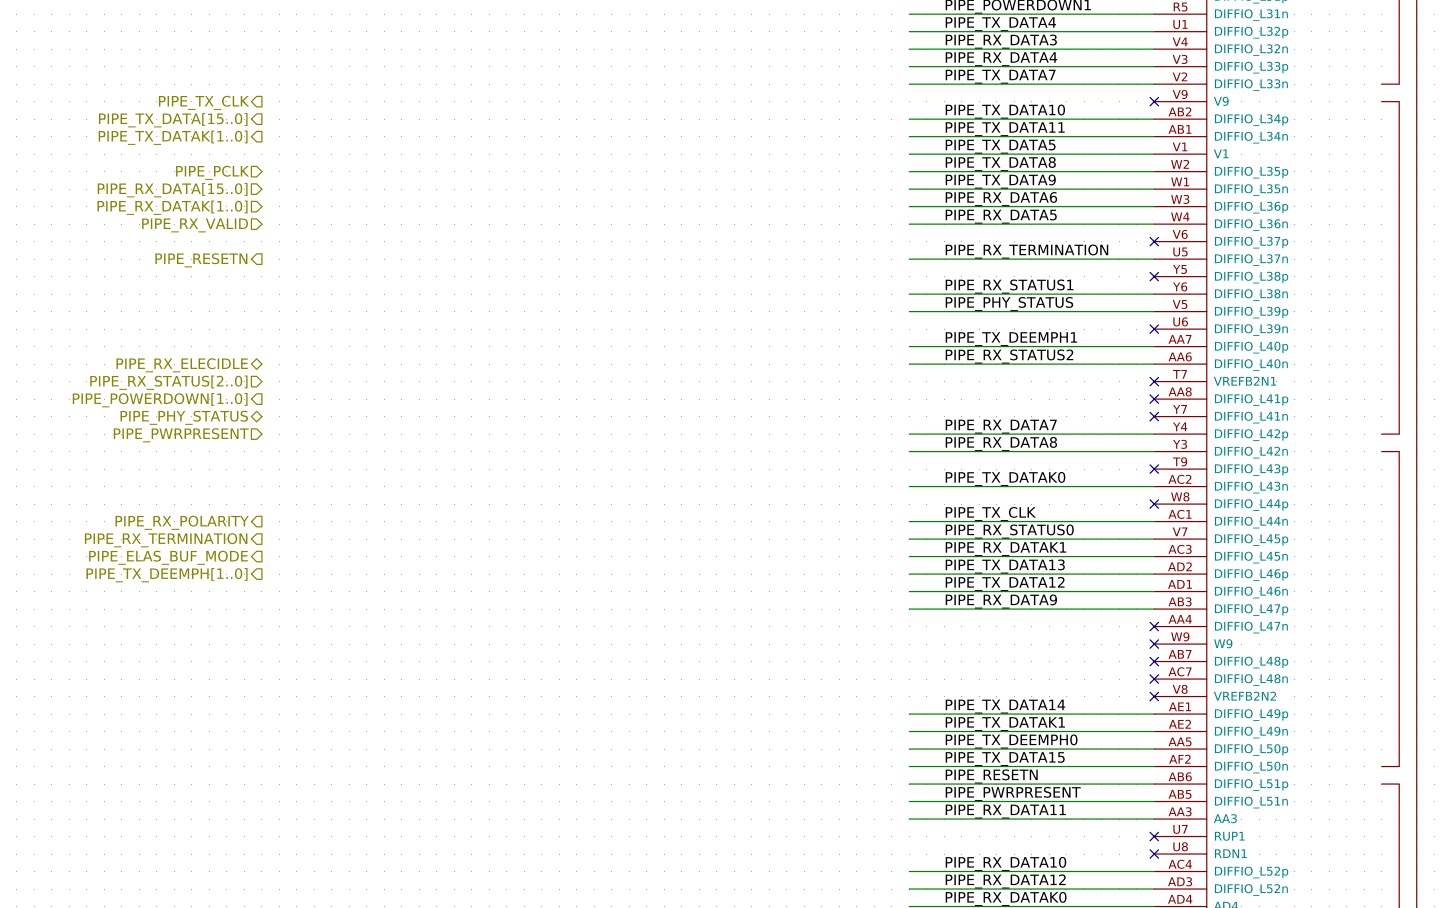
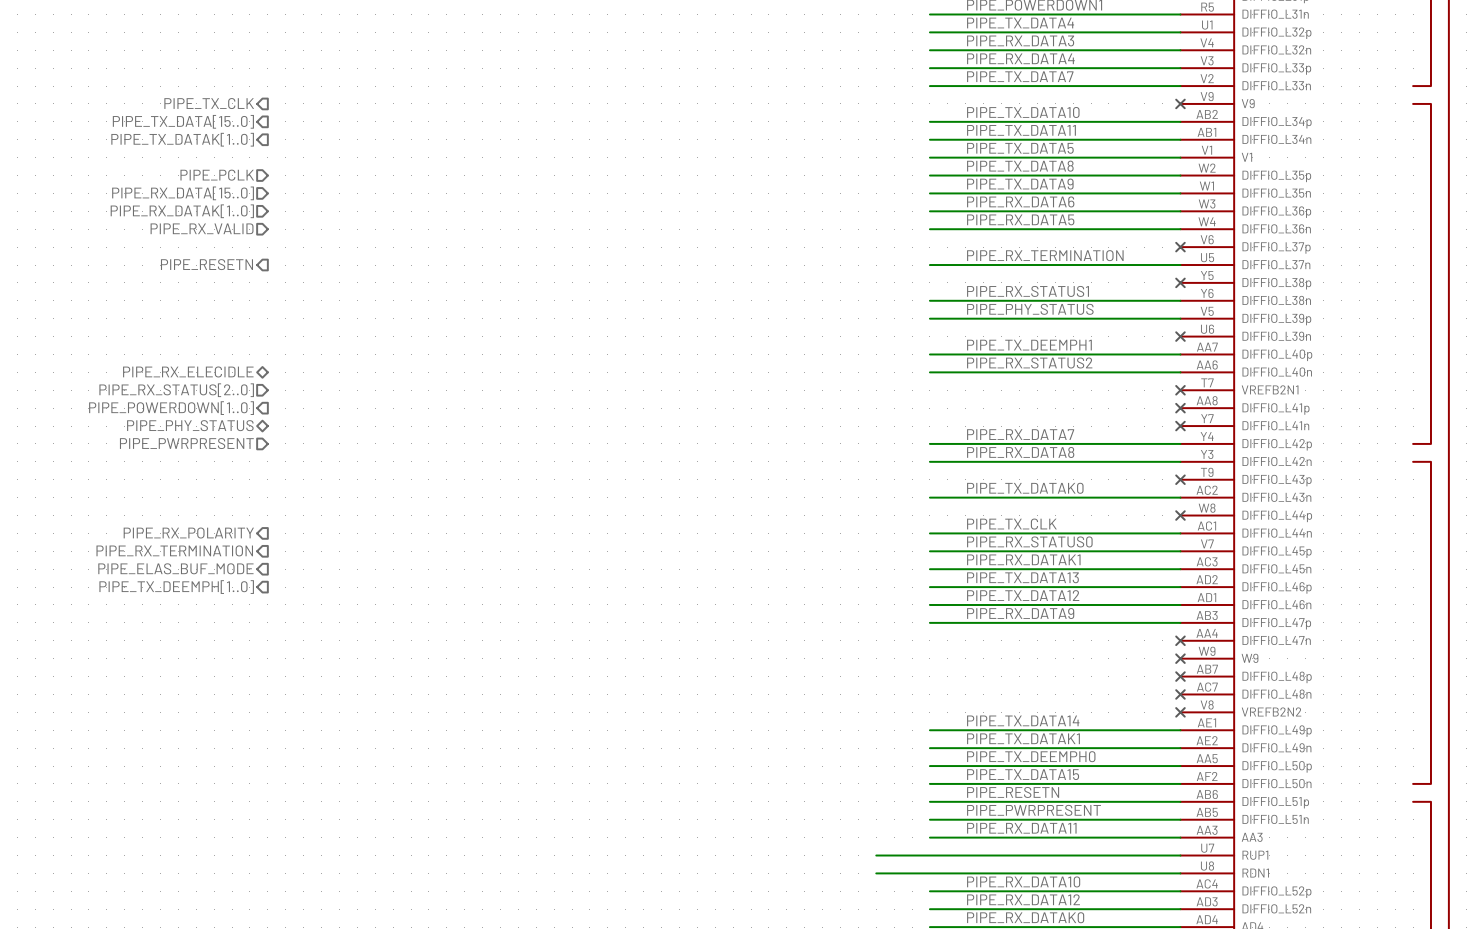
wire: none -> (876, 855) (1180, 855)
no-connect mark: (1154, 836) -> none
wire: none -> (876, 873) (1180, 873)
no-connect mark: (1154, 854) -> none

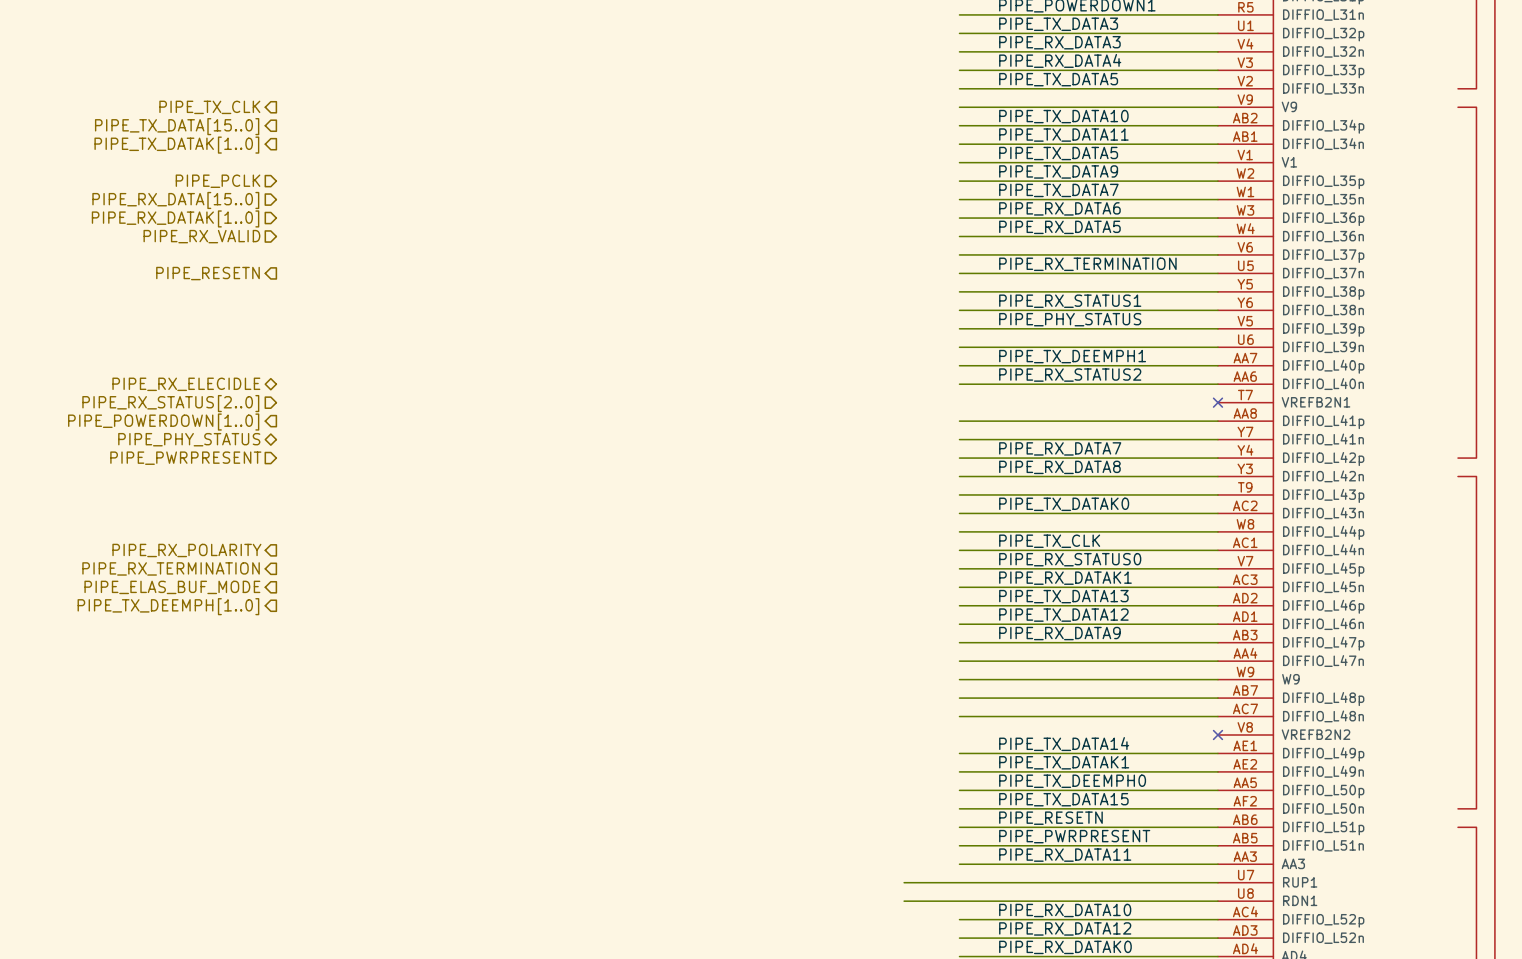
label: PIPE_TX_DATA4 (1020, 23) -> PIPE_TX_DATA3 (1058, 24)
label: PIPE_TX_DATA7 (1020, 76) -> PIPE_TX_DATA5 (1058, 79)
wire: none -> (959, 107) (1217, 107)
no-connect mark: (1180, 103) -> none
label: PIPE_TX_DATA8 (1020, 166) -> PIPE_TX_DATA9 (1058, 171)
label: PIPE_TX_DATA9 (1020, 184) -> PIPE_TX_DATA7 (1058, 190)
wire: none -> (959, 254) (1217, 254)
no-connect mark: (1180, 247) -> none
wire: none -> (959, 291) (1217, 291)
no-connect mark: (1180, 282) -> none
wire: none -> (959, 347) (1217, 347)
no-connect mark: (1180, 336) -> none
wire: none -> (959, 421) (1217, 421)
no-connect mark: (1180, 408) -> none
wire: none -> (959, 439) (1217, 439)
no-connect mark: (1180, 426) -> none
wire: none -> (959, 494) (1217, 494)
no-connect mark: (1180, 479) -> none
wire: none -> (959, 531) (1217, 531)
no-connect mark: (1180, 515) -> none
wire: none -> (959, 661) (1217, 661)
no-connect mark: (1180, 640) -> none
wire: none -> (959, 679) (1217, 679)
no-connect mark: (1180, 658) -> none
wire: none -> (959, 698) (1217, 698)
no-connect mark: (1180, 676) -> none
wire: none -> (959, 716) (1217, 716)
no-connect mark: (1180, 694) -> none

